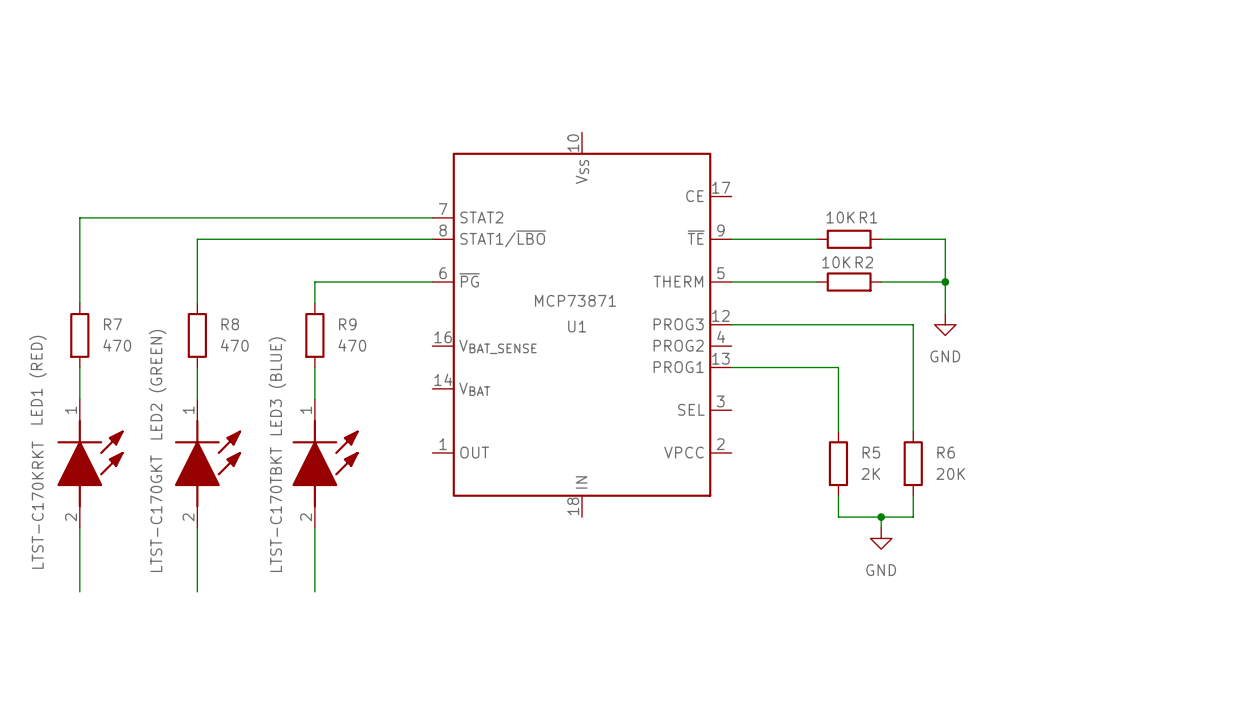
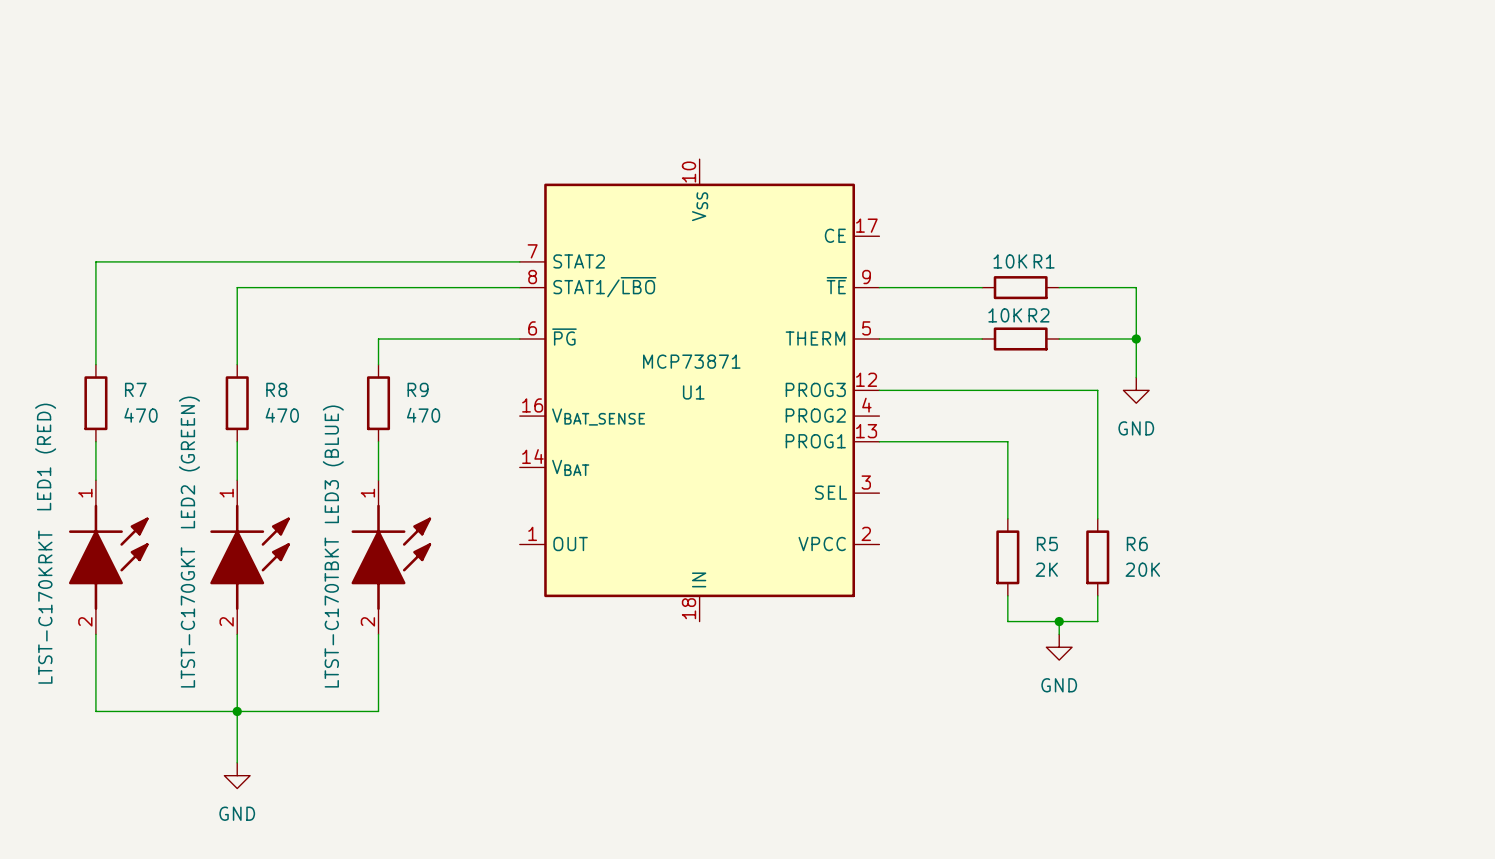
wire: none -> (95, 711) (378, 711)
wire: none -> (237, 711) (237, 762)
junction: none -> (237, 711)
power symbol: none -> GND (237, 775)

